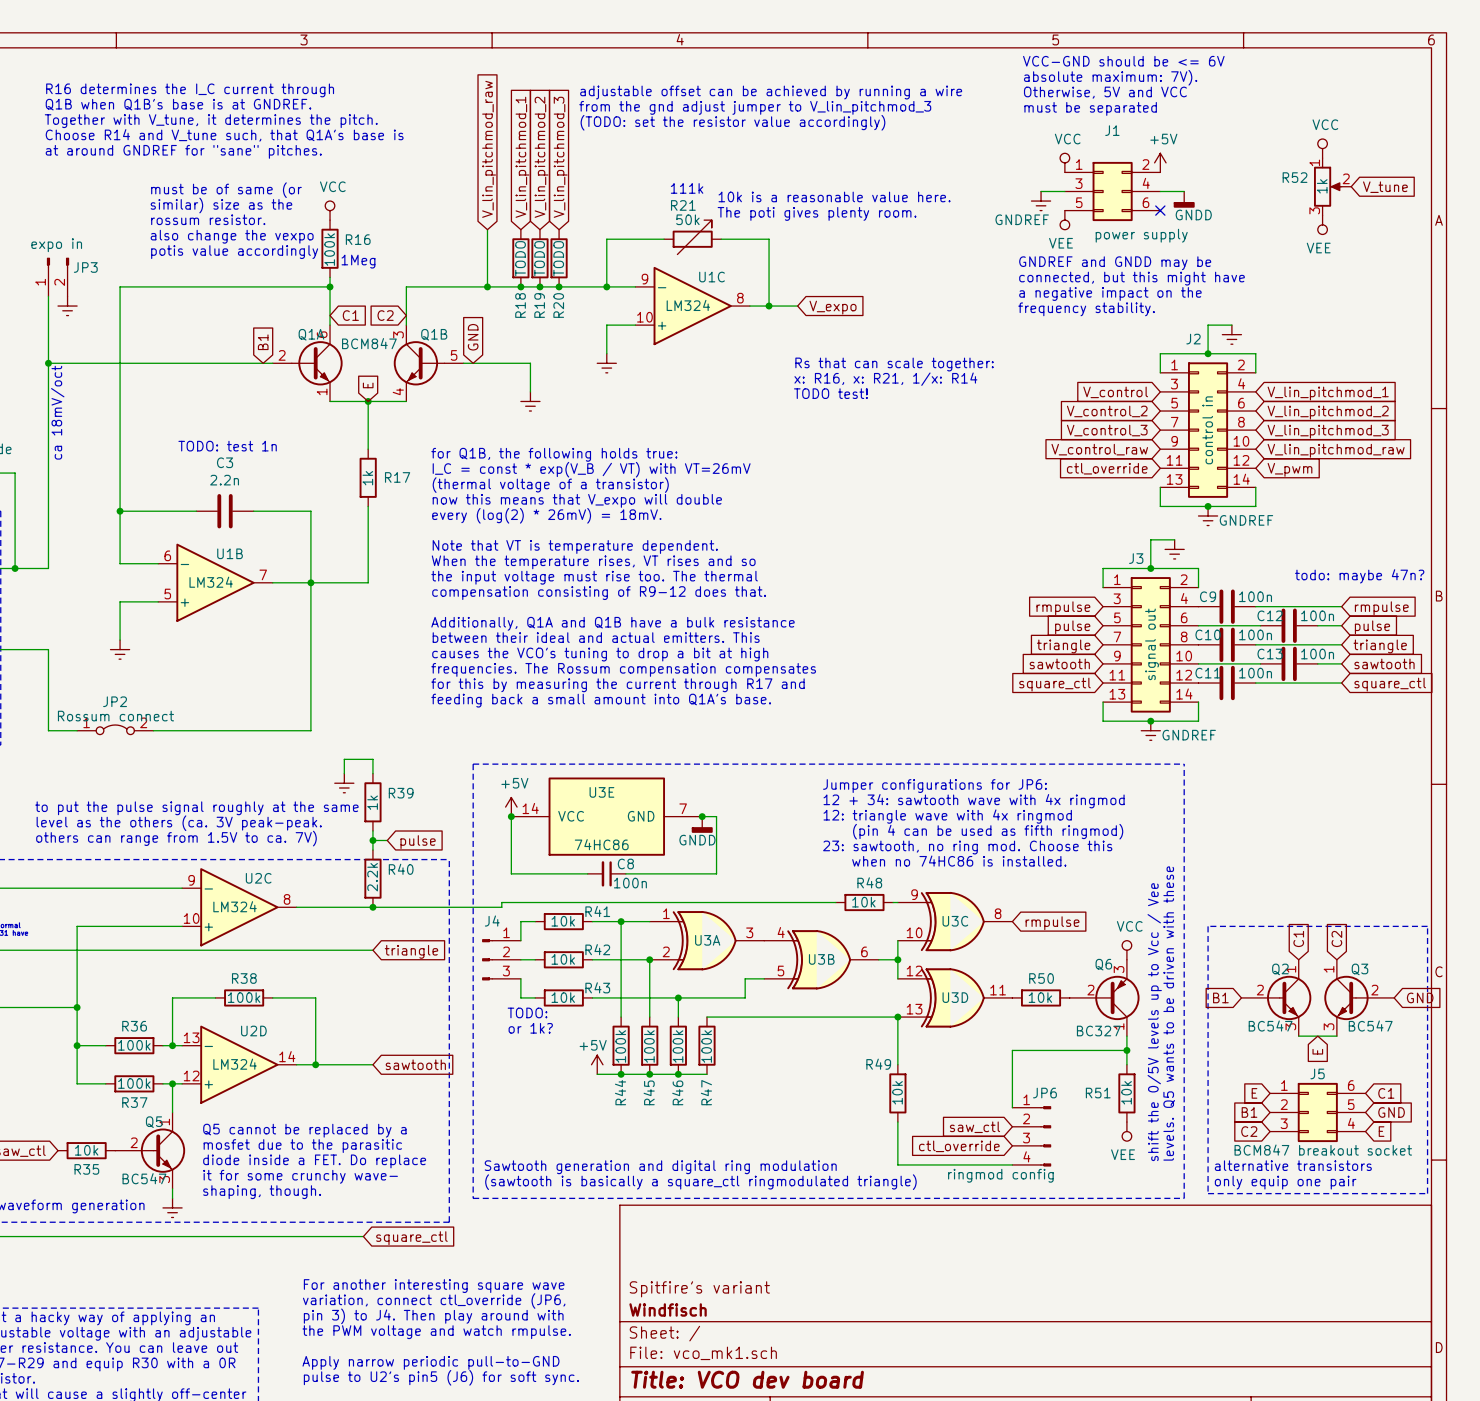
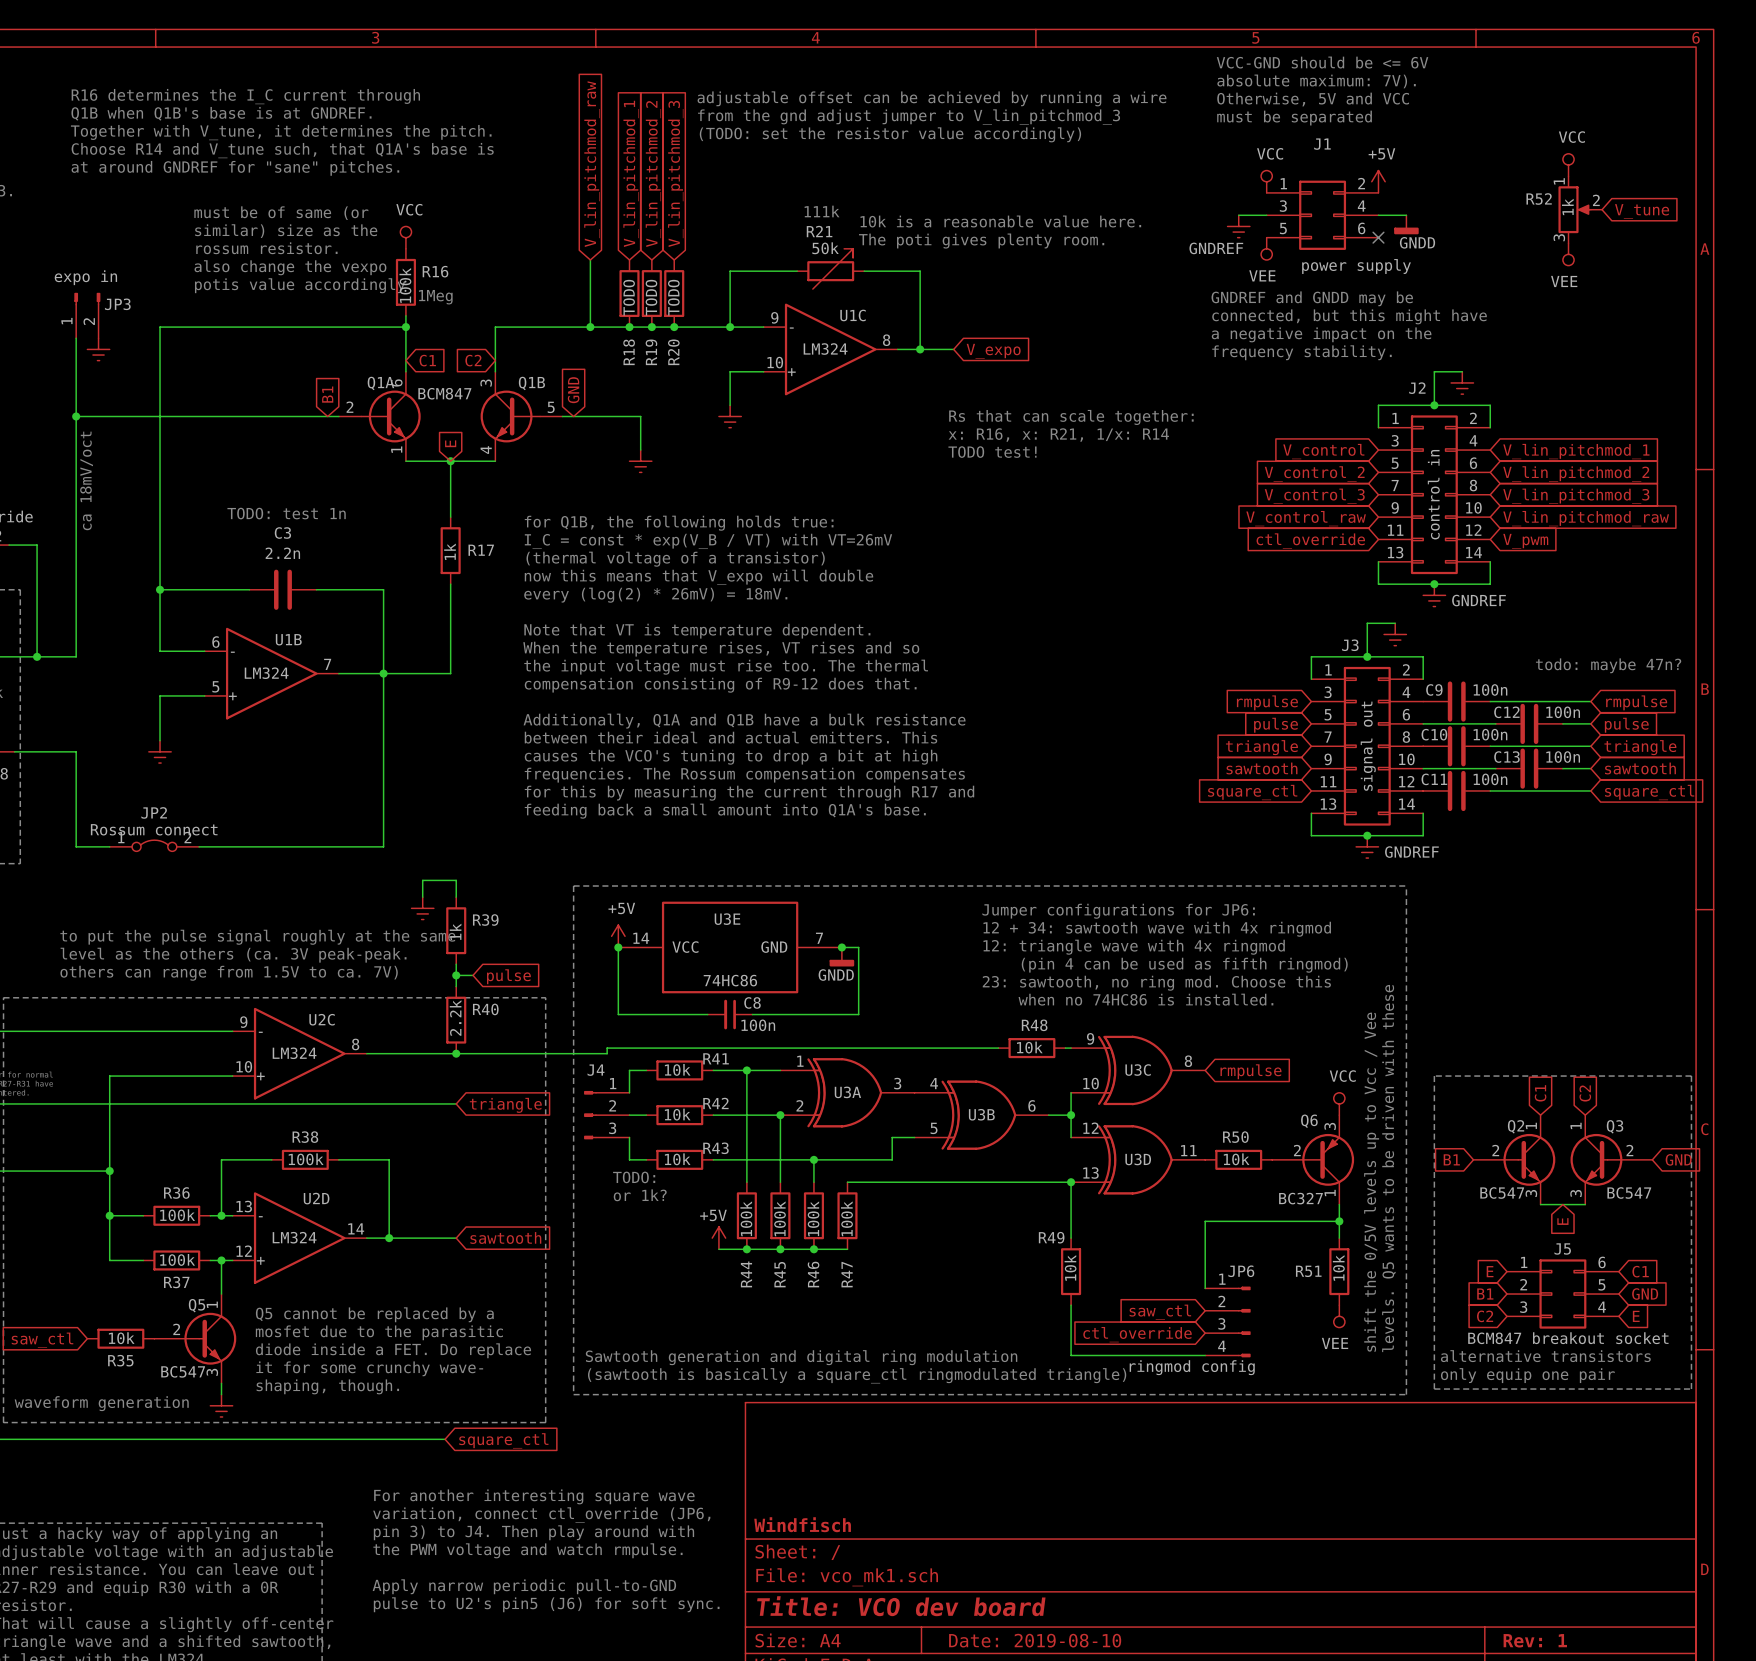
title block: Spitfire's variant (699, 1289) -> none

